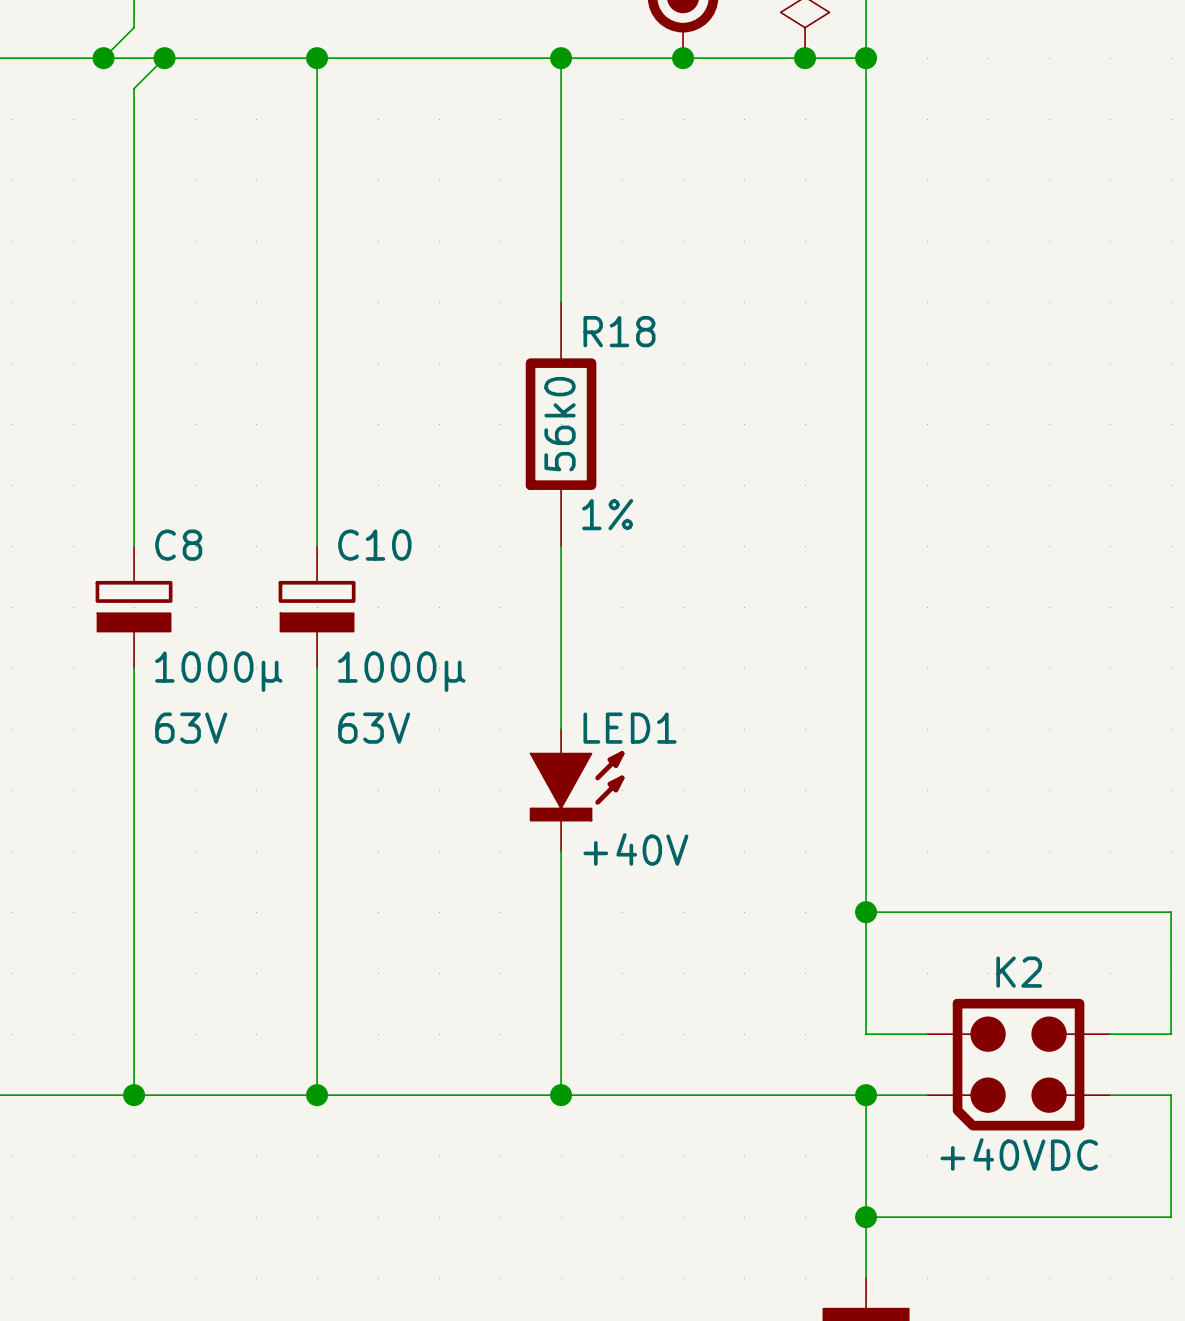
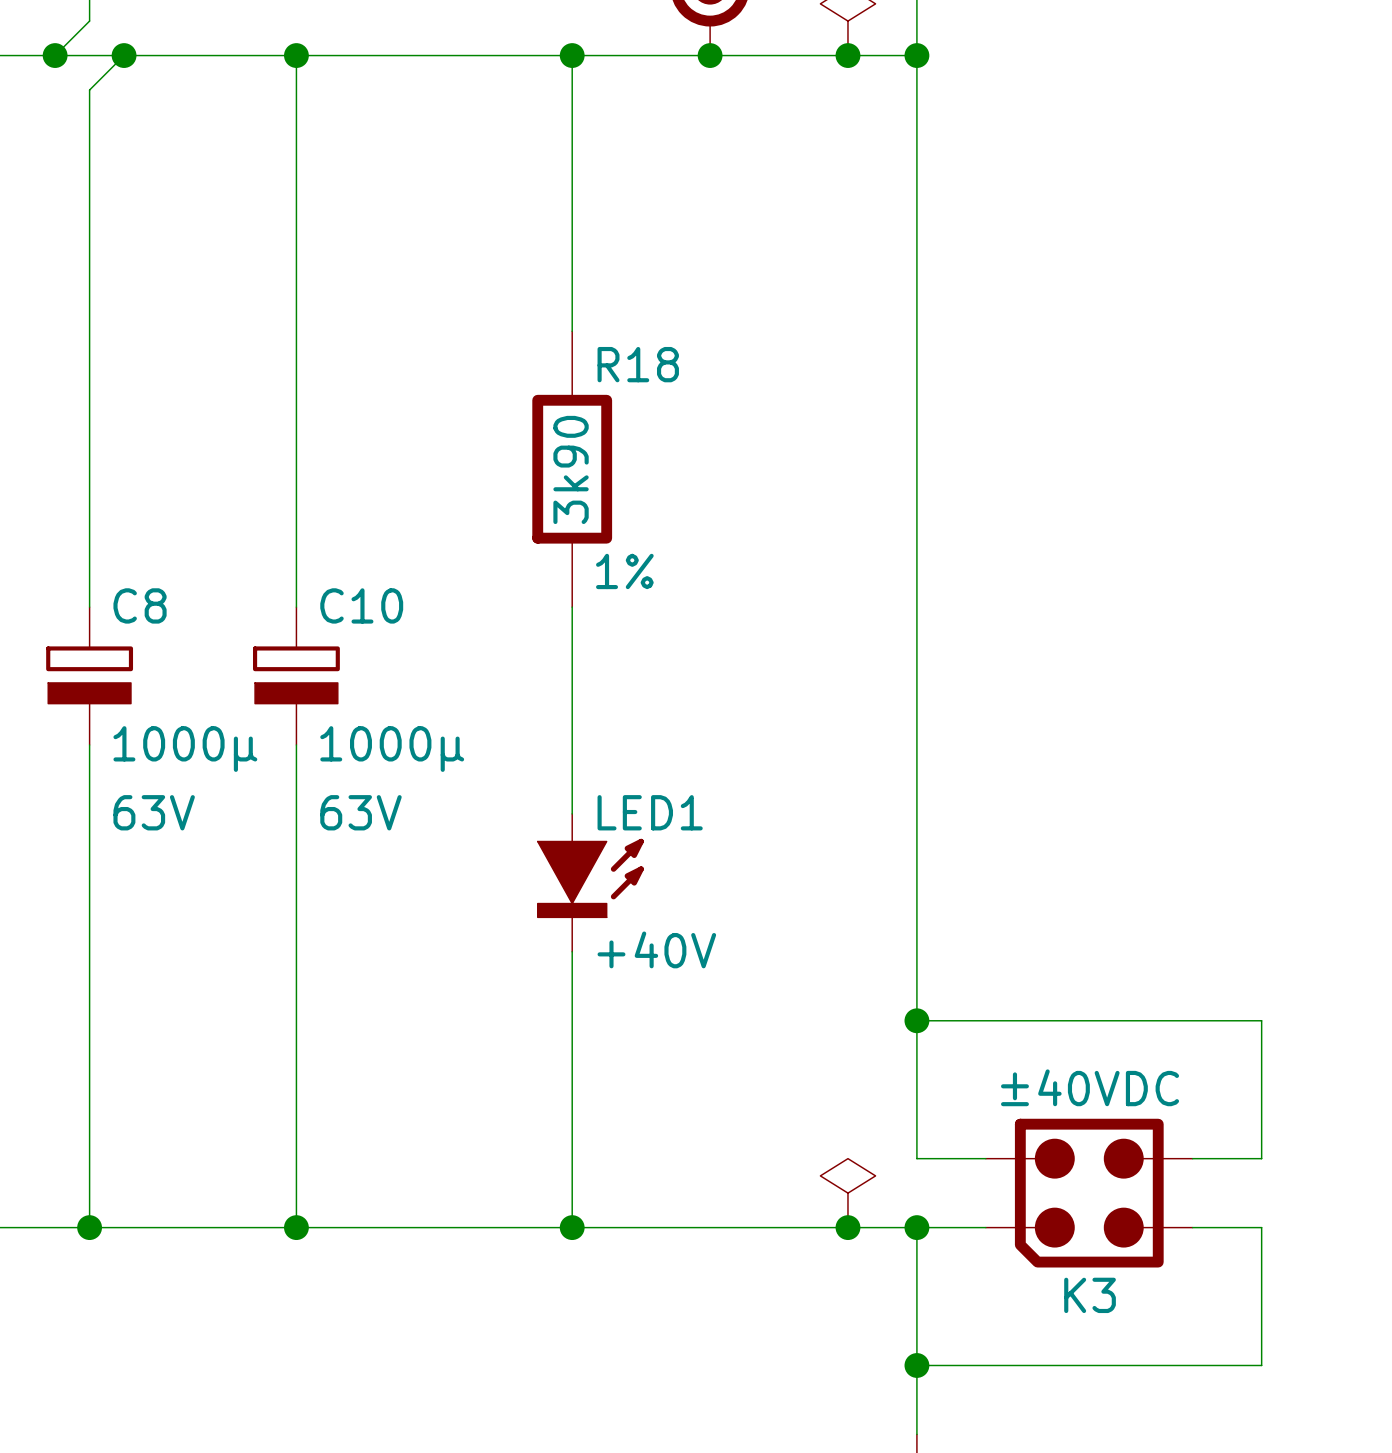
R18 value: 56k0 (560, 424) -> 3k90 (571, 469)
K2 name: K2 (1019, 972) -> K3 (1090, 1295)
power symbol: none -> (847, 1193)
junction: none -> (847, 1227)
K2 value: +40VDC (1019, 1154) -> ±40VDC (1090, 1087)

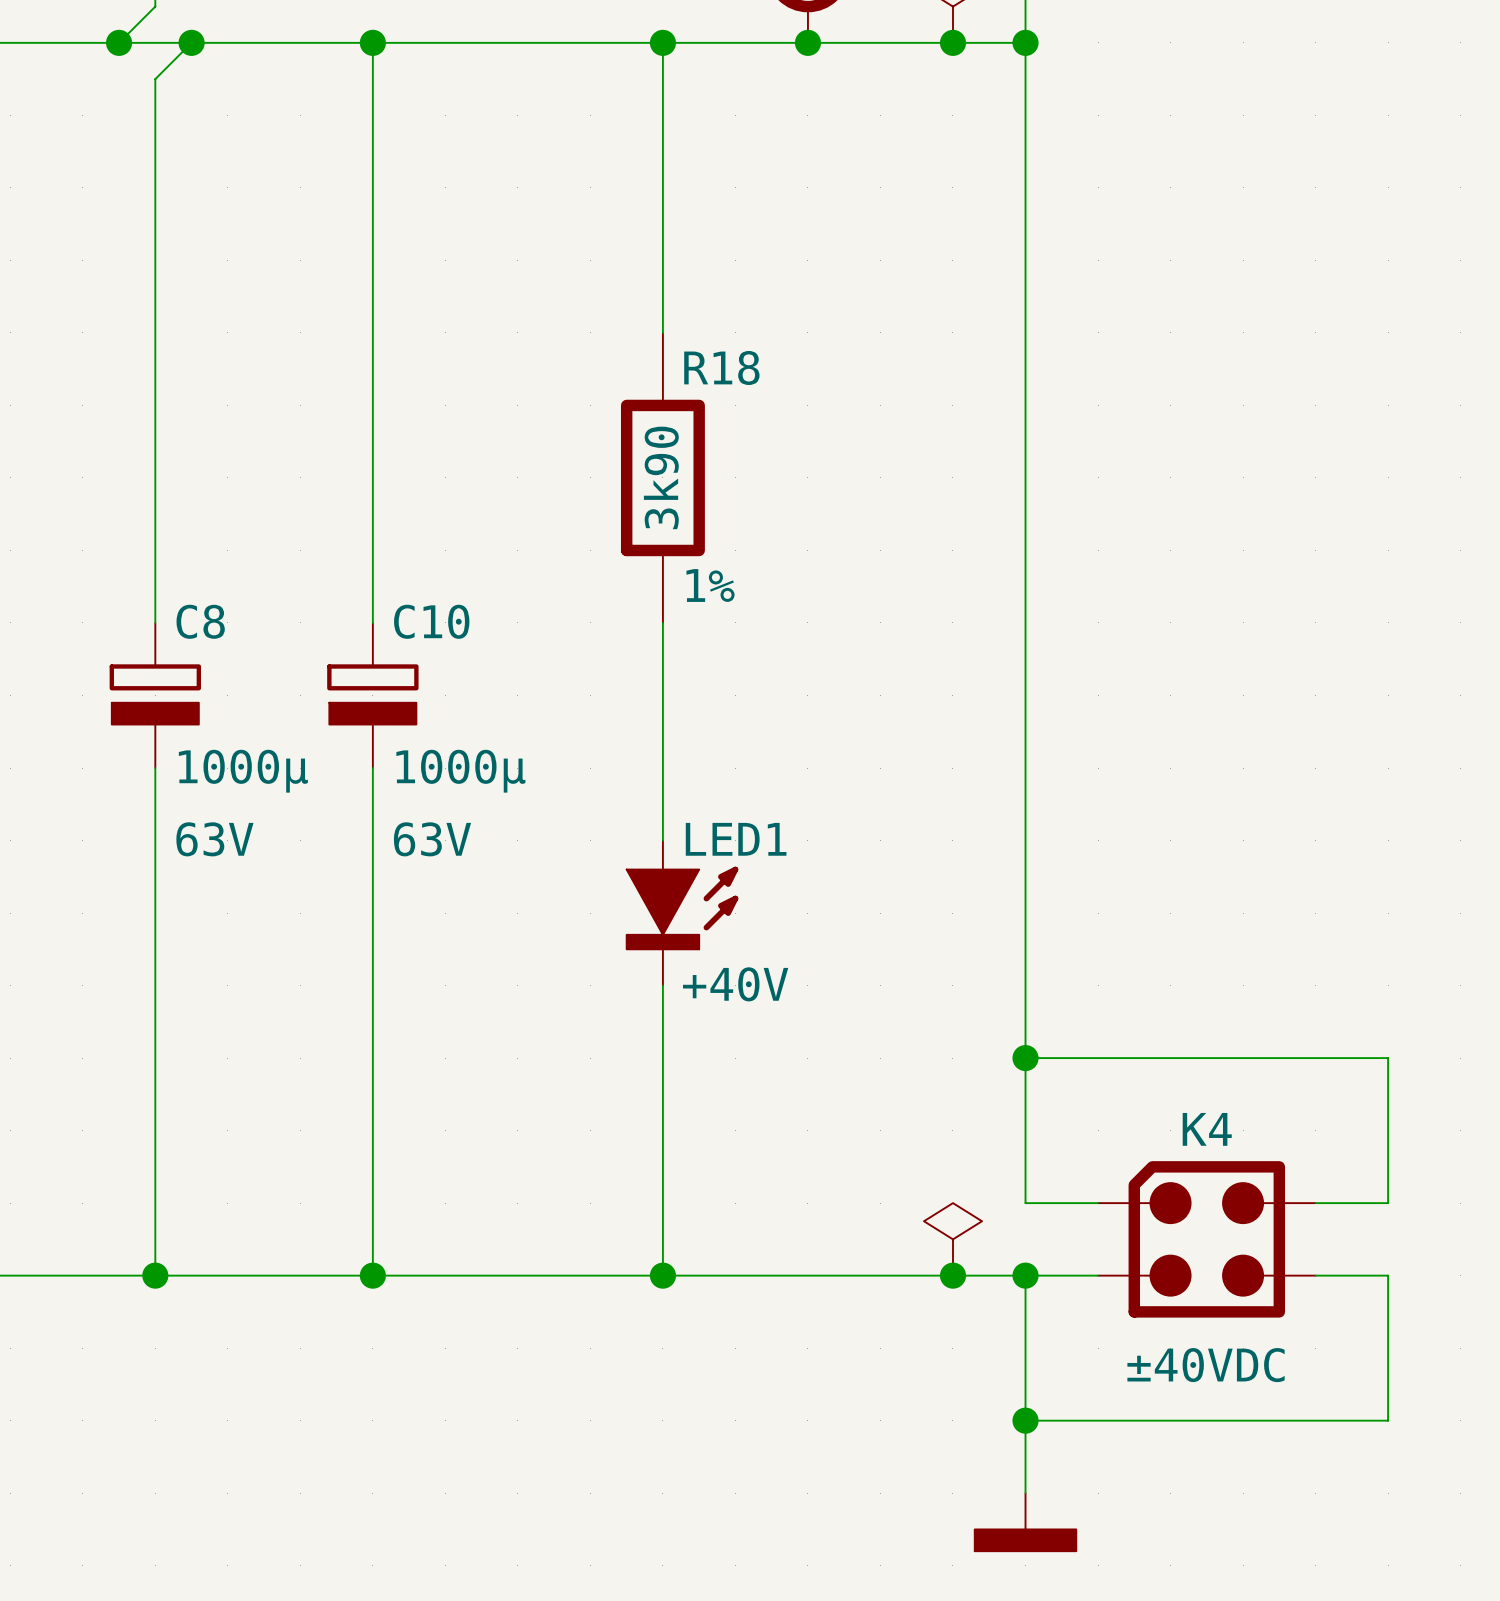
K3: ±40VDC (1089, 1193) -> none
K4: none -> ±40VDC (1206, 1239)

